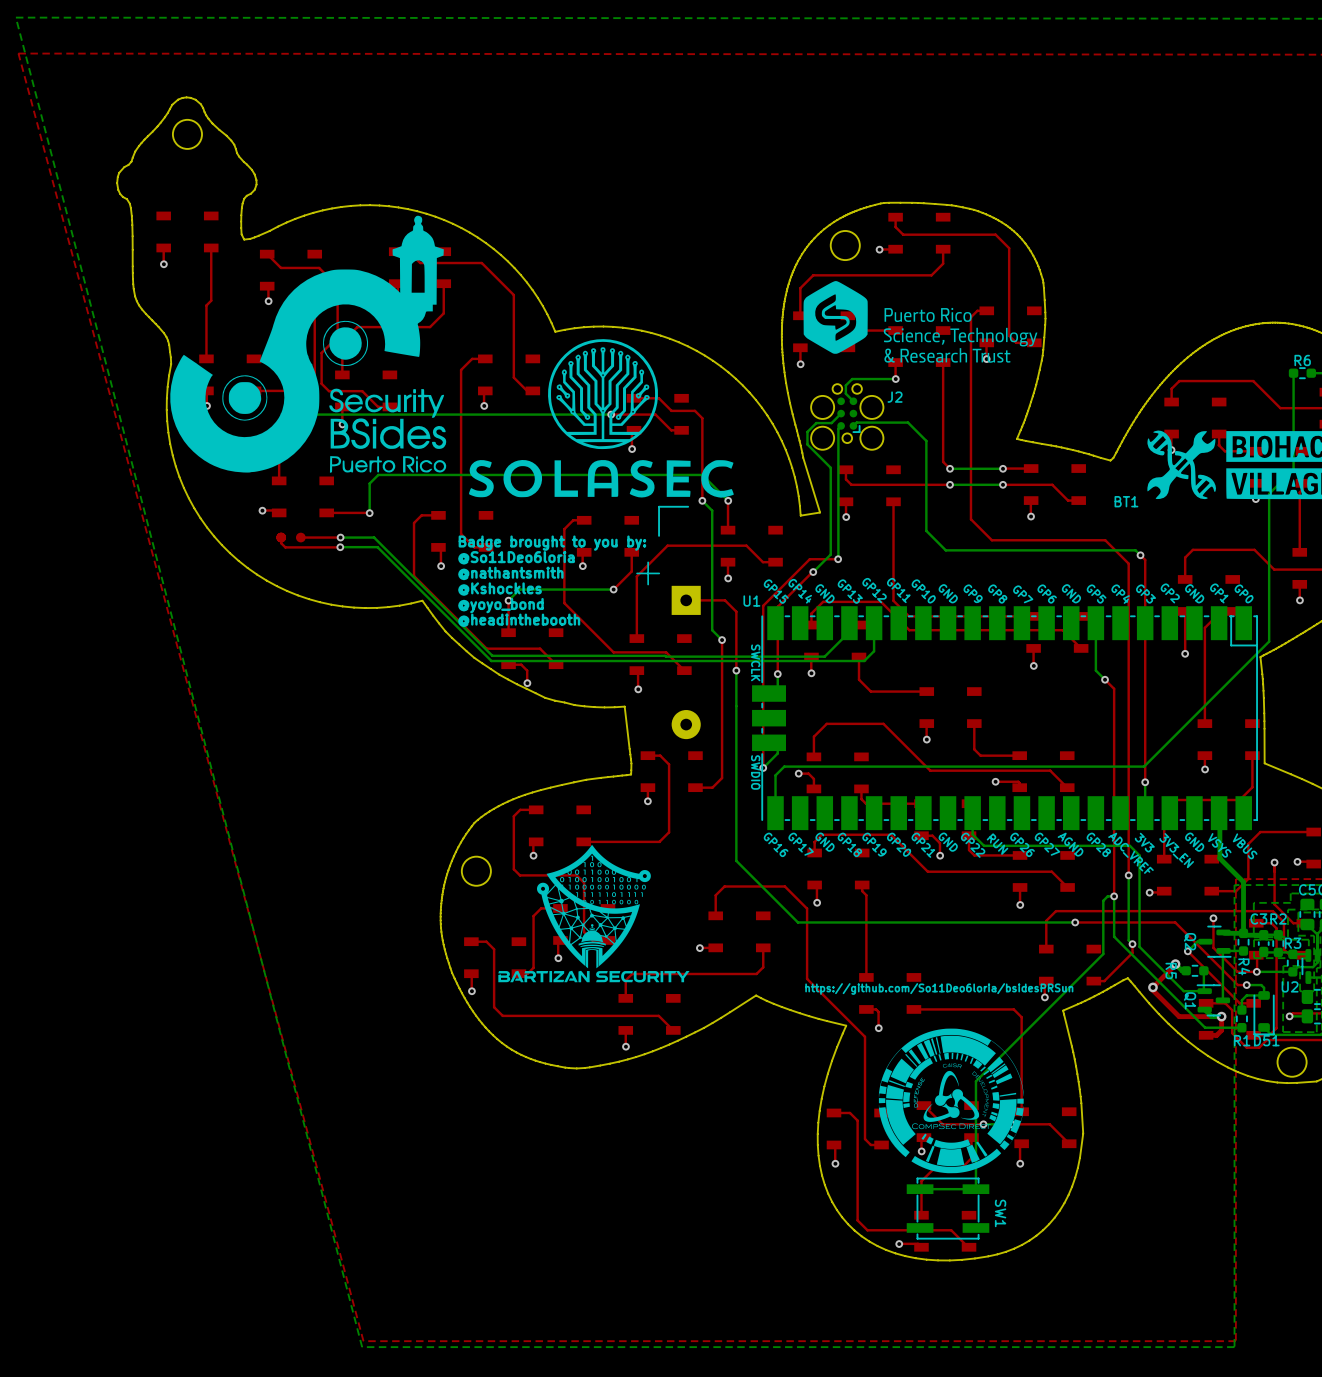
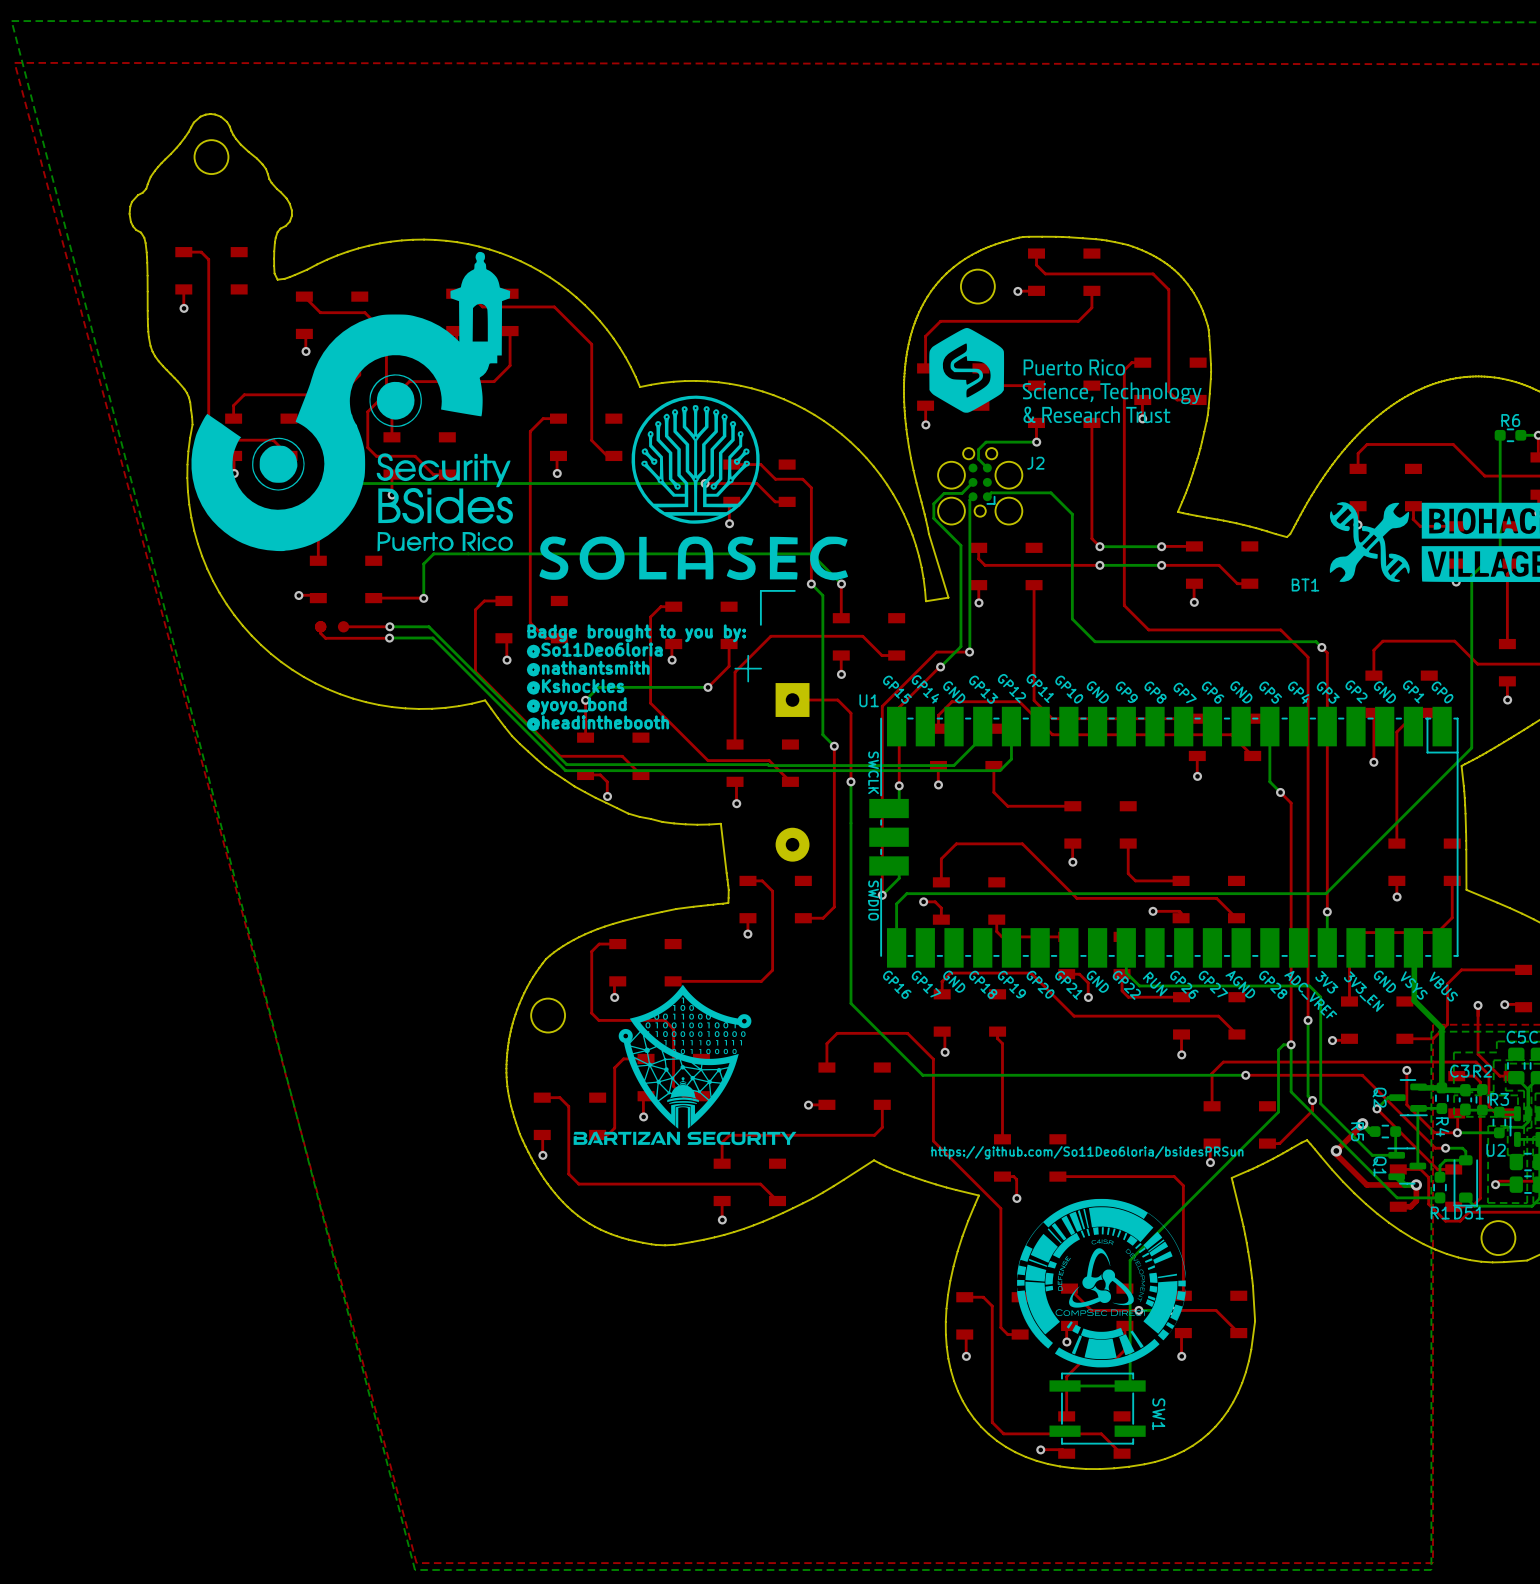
top track: none -> (183, 252) (201, 252) (208, 259) (208, 429) (219, 440) (273, 440) (289, 455)
top track: (211, 247) (211, 300) (206, 305) (206, 347) -> none
top track: (314, 321) (314, 384) (308, 390) (254, 390) -> (359, 374) (339, 394) (244, 394) (233, 405)

